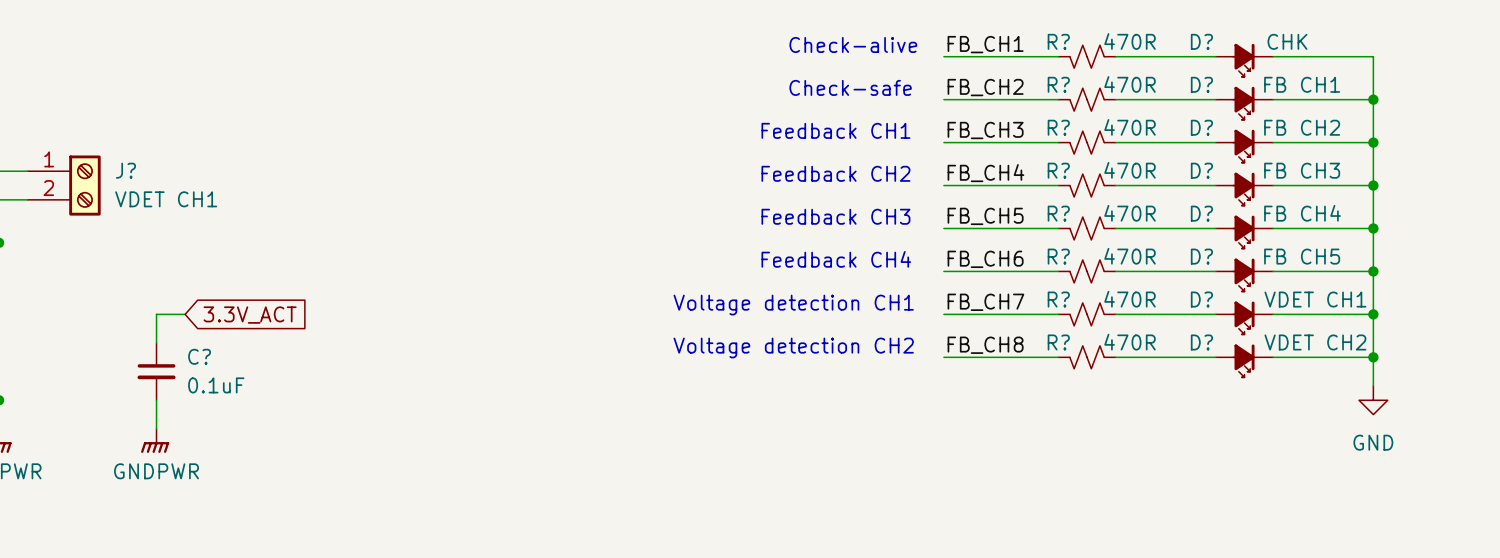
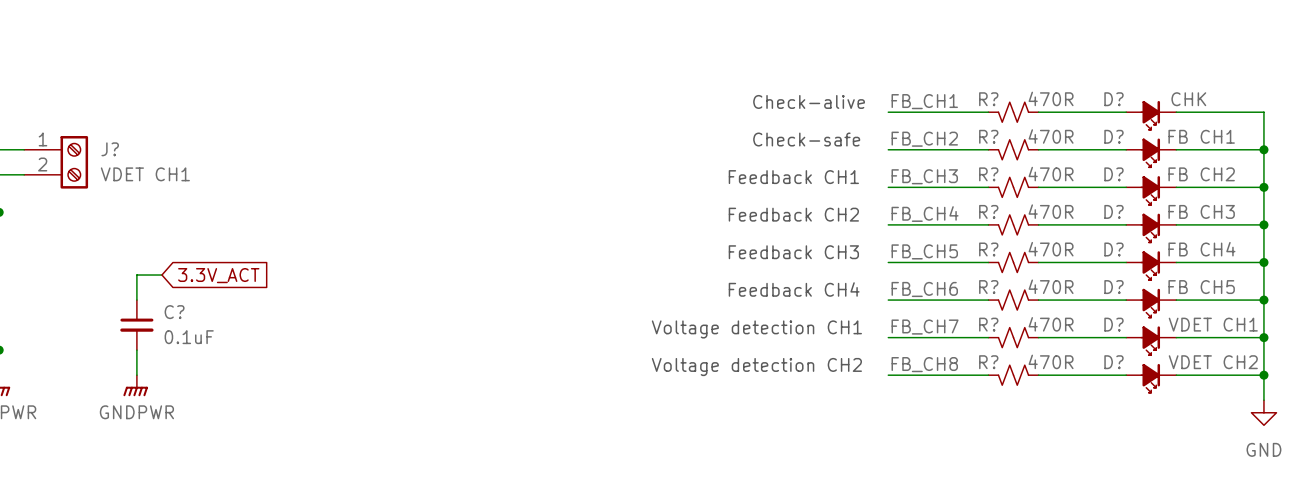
text position: Check-alive (853, 44) -> Check-alive (809, 101)
label position: FB_CH1 (985, 44) -> FB_CH1 (924, 101)
wire: (943, 56) (1058, 56) -> (888, 112) (988, 112)
R?: 470R (1087, 56) -> none
wire: (1115, 56) (1215, 56) -> (1038, 112) (1126, 112)
wire: (1273, 56) (1373, 56) (1373, 385) -> (1176, 112) (1263, 112) (1263, 400)
D? position: (1244, 60) -> (1151, 115)
text position: Check-safe (850, 87) -> Check-safe (806, 139)
label position: FB_CH2 (985, 87) -> FB_CH2 (924, 139)
wire: (943, 99) (1058, 99) -> (888, 149) (988, 149)
R?: 470R (1087, 99) -> none
wire: (1115, 99) (1215, 99) -> (1038, 149) (1126, 149)
wire: (1273, 99) (1373, 99) -> (1176, 149) (1263, 149)
junction: (1373, 99) -> none
D? position: (1244, 103) -> (1151, 152)
R?: none -> 470R (1013, 112)
text position: Feedback CH1 (835, 130) -> Feedback CH1 (793, 177)
label position: FB_CH3 (985, 130) -> FB_CH3 (924, 176)
wire: (943, 142) (1058, 142) -> (888, 187) (988, 187)
R?: 470R (1087, 142) -> none
wire: (1115, 142) (1215, 142) -> (1038, 187) (1126, 187)
wire: (1273, 142) (1373, 142) -> (1176, 187) (1263, 187)
junction: (1373, 142) -> none
D? position: (1244, 146) -> (1151, 190)
R?: none -> 470R (1013, 149)
junction: none -> (1263, 149)
text position: Feedback CH2 (835, 173) -> Feedback CH2 (793, 214)
label position: FB_CH4 (985, 173) -> FB_CH4 (925, 214)
wire: (943, 185) (1058, 185) -> (888, 224) (988, 224)
R?: 470R (1087, 185) -> none
wire: (1115, 185) (1215, 185) -> (1038, 224) (1126, 224)
wire: (1273, 185) (1373, 185) -> (1176, 224) (1263, 224)
junction: (1373, 185) -> none
D? position: (1244, 189) -> (1151, 228)
R?: none -> 470R (1013, 187)
junction: none -> (1263, 187)
text position: Feedback CH3 (835, 216) -> Feedback CH3 (793, 252)
label position: FB_CH5 (985, 216) -> FB_CH5 (924, 251)
wire: (943, 228) (1058, 228) -> (888, 262) (988, 262)
R?: 470R (1087, 228) -> none
wire: (1115, 228) (1215, 228) -> (1038, 262) (1126, 262)
wire: (1273, 228) (1373, 228) -> (1176, 262) (1263, 262)
junction: (1373, 228) -> none
D? position: (1244, 232) -> (1151, 265)
R?: none -> 470R (1013, 224)
junction: none -> (1263, 224)
text position: Feedback CH4 (836, 259) -> Feedback CH4 (794, 289)
label position: FB_CH6 (985, 259) -> FB_CH6 (924, 289)
wire: (943, 271) (1058, 271) -> (888, 300) (988, 300)
R?: 470R (1087, 271) -> none
wire: (1115, 271) (1215, 271) -> (1038, 300) (1126, 300)
wire: (1273, 271) (1373, 271) -> (1176, 300) (1263, 300)
junction: (1373, 271) -> none
D? position: (1244, 275) -> (1151, 303)
R?: none -> 470R (1013, 262)
junction: none -> (1263, 262)
label position: FB_CH7 (985, 302) -> FB_CH7 (925, 327)
text position: Voltage detection CH1 (793, 305) -> Voltage detection CH1 (756, 329)
wire: (943, 314) (1058, 314) -> (888, 337) (988, 337)
R?: 470R (1087, 314) -> none
wire: (1115, 314) (1215, 314) -> (1038, 337) (1126, 337)
wire: (1273, 314) (1373, 314) -> (1176, 337) (1263, 337)
junction: (1373, 314) -> none
D? position: (1244, 317) -> (1151, 340)
R?: none -> 470R (1013, 300)
junction: none -> (1263, 300)
label position: FB_CH8 (985, 345) -> FB_CH8 (924, 364)
text position: Voltage detection CH2 (793, 347) -> Voltage detection CH2 (756, 367)
wire: (943, 357) (1058, 357) -> (888, 375) (988, 375)
R?: 470R (1087, 357) -> none
wire: (1115, 357) (1215, 357) -> (1038, 375) (1126, 375)
wire: (1273, 357) (1373, 357) -> (1176, 375) (1263, 375)
junction: (1373, 357) -> none
D? position: (1244, 360) -> (1151, 378)
R?: none -> 470R (1013, 337)
junction: none -> (1263, 337)
power symbol position: GND (1373, 400) -> GND (1263, 412)
R?: none -> 470R (1013, 375)
junction: none -> (1263, 375)

